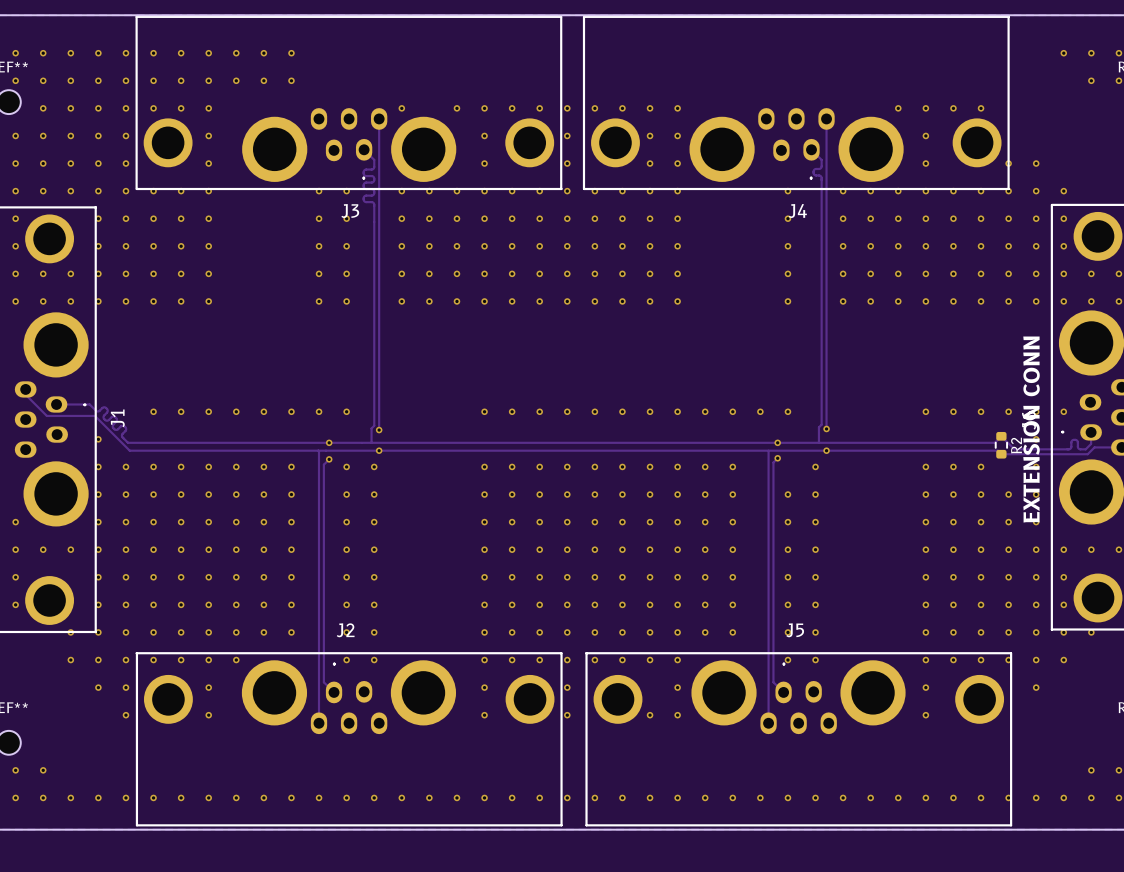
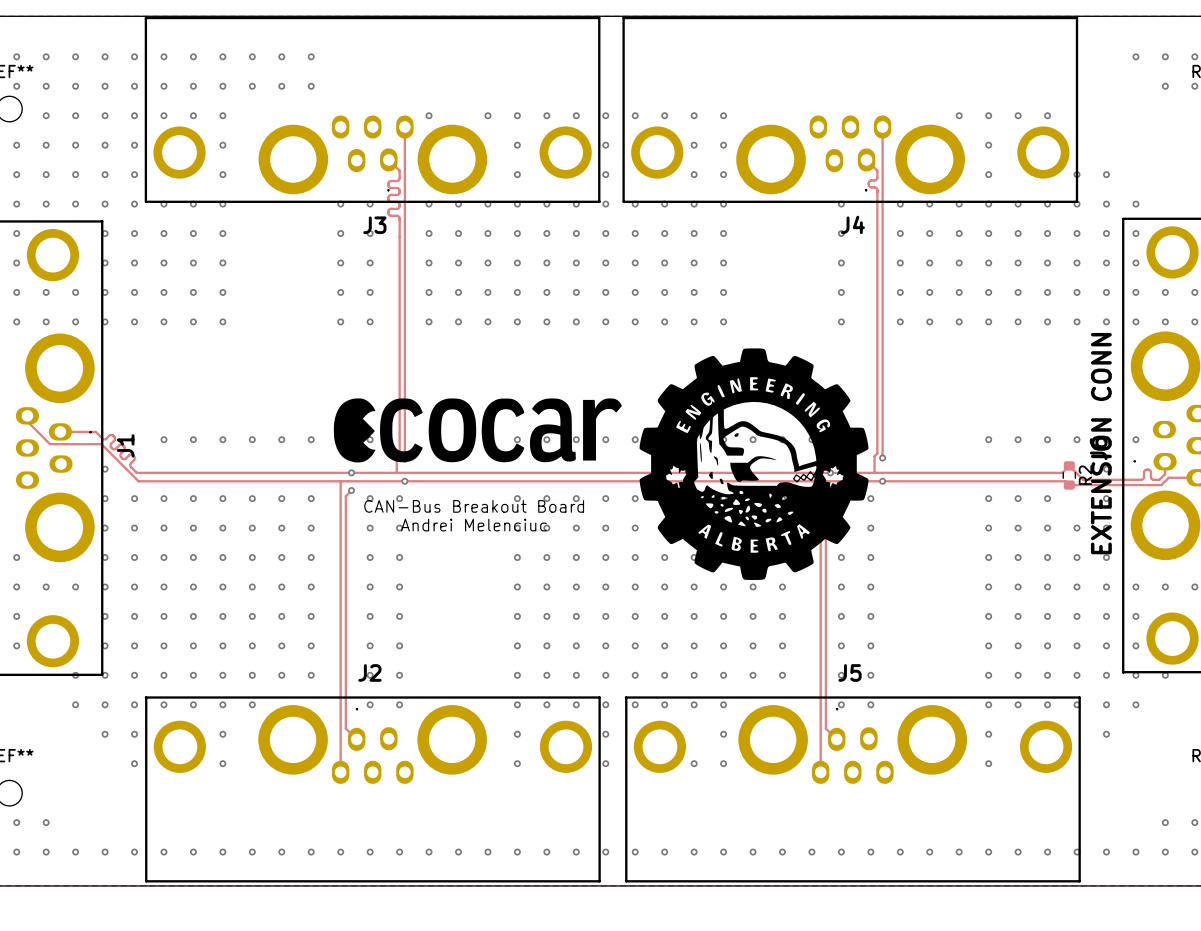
drawing: none -> [639, 348, 869, 580]
drawing: none -> [333, 398, 622, 463]
text: none -> CAN-Bus Breakout Board (474, 506)
text: none -> Andrei Melenciuc (473, 525)

